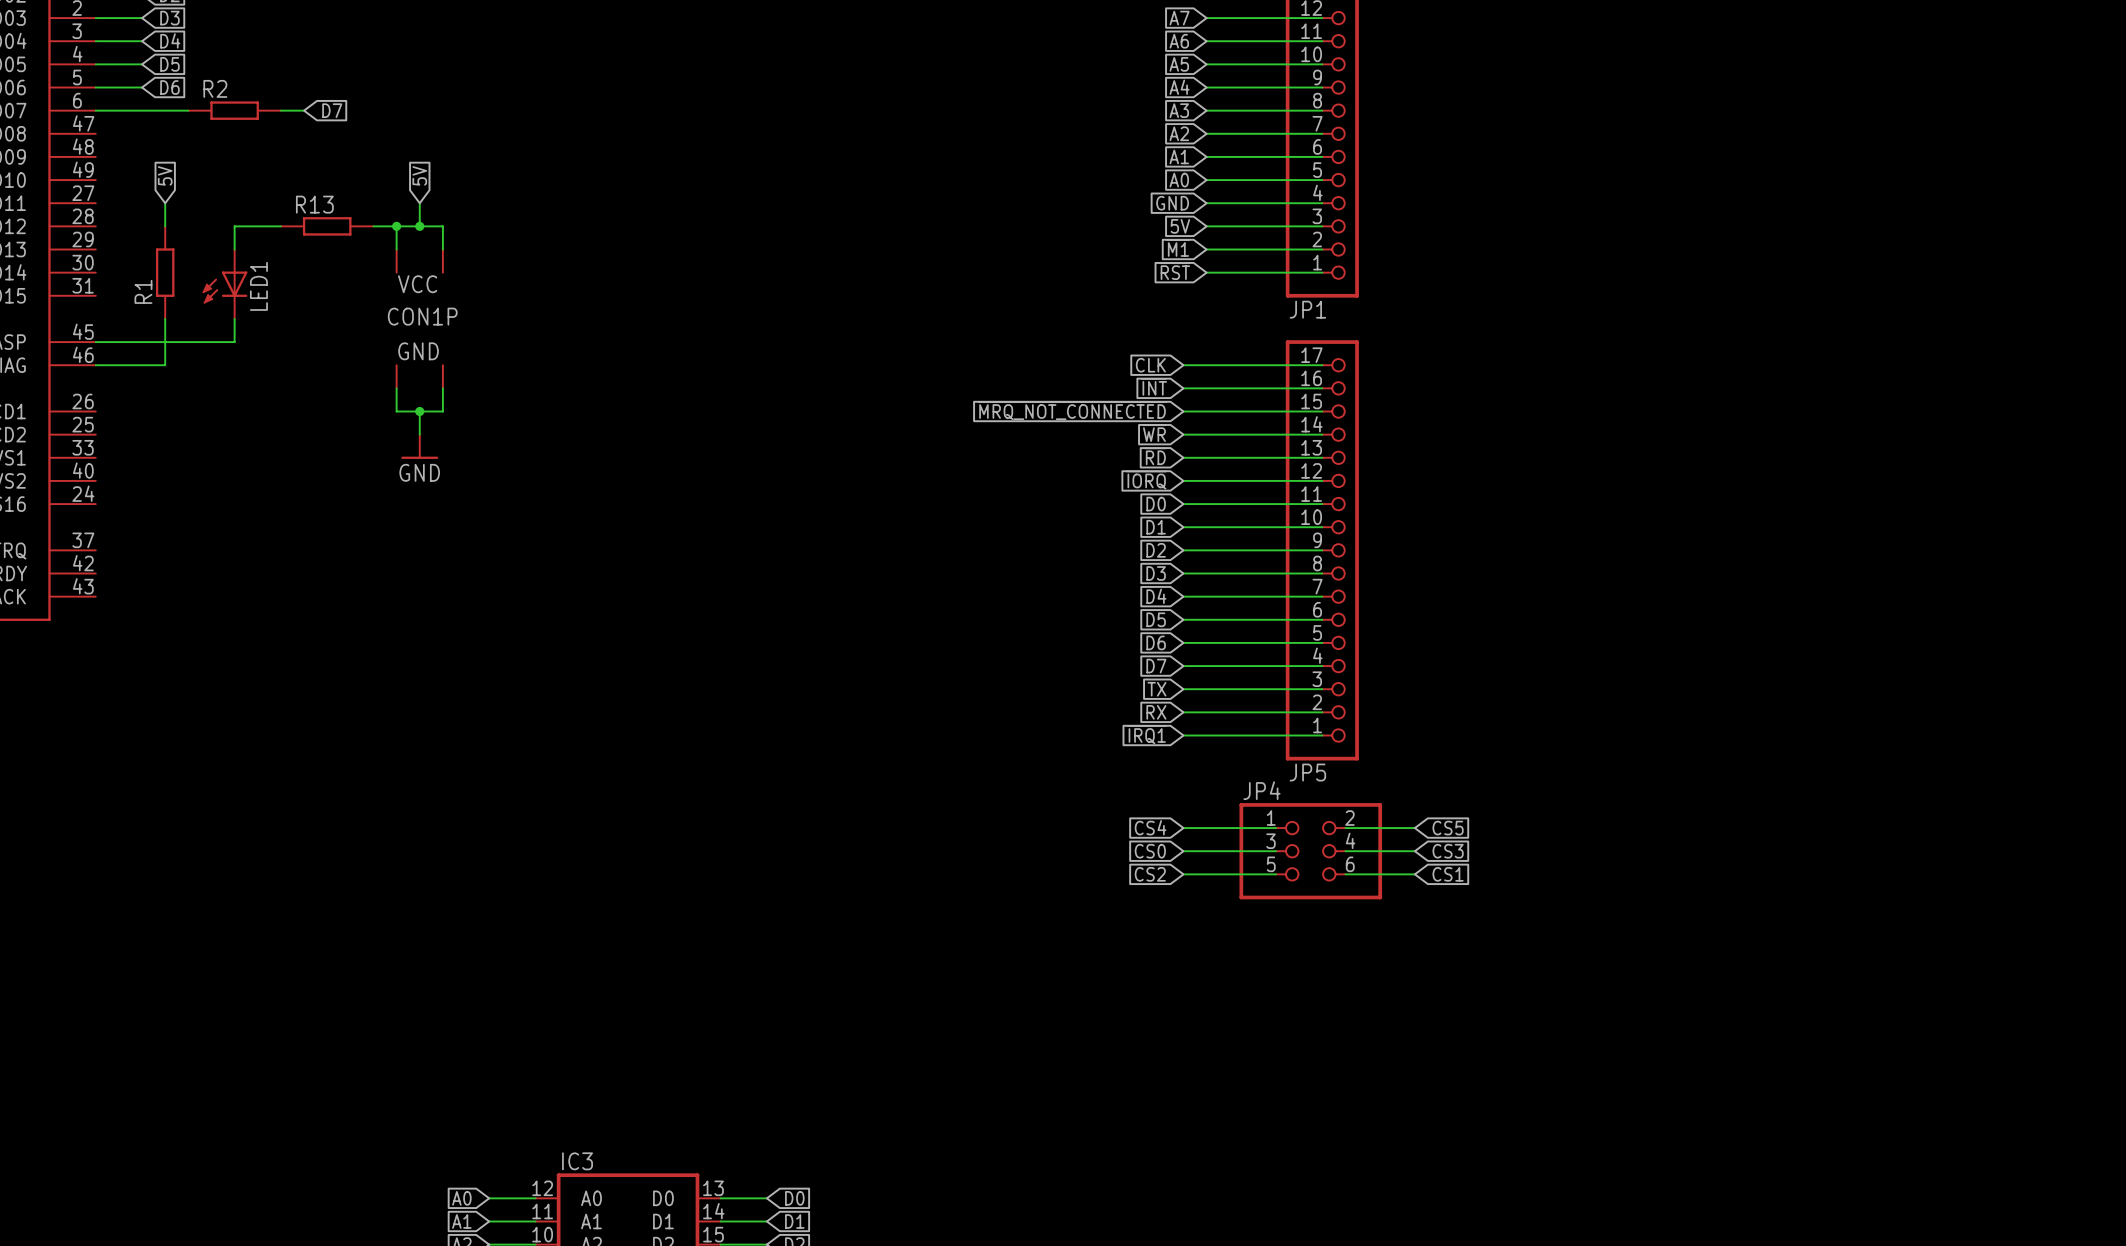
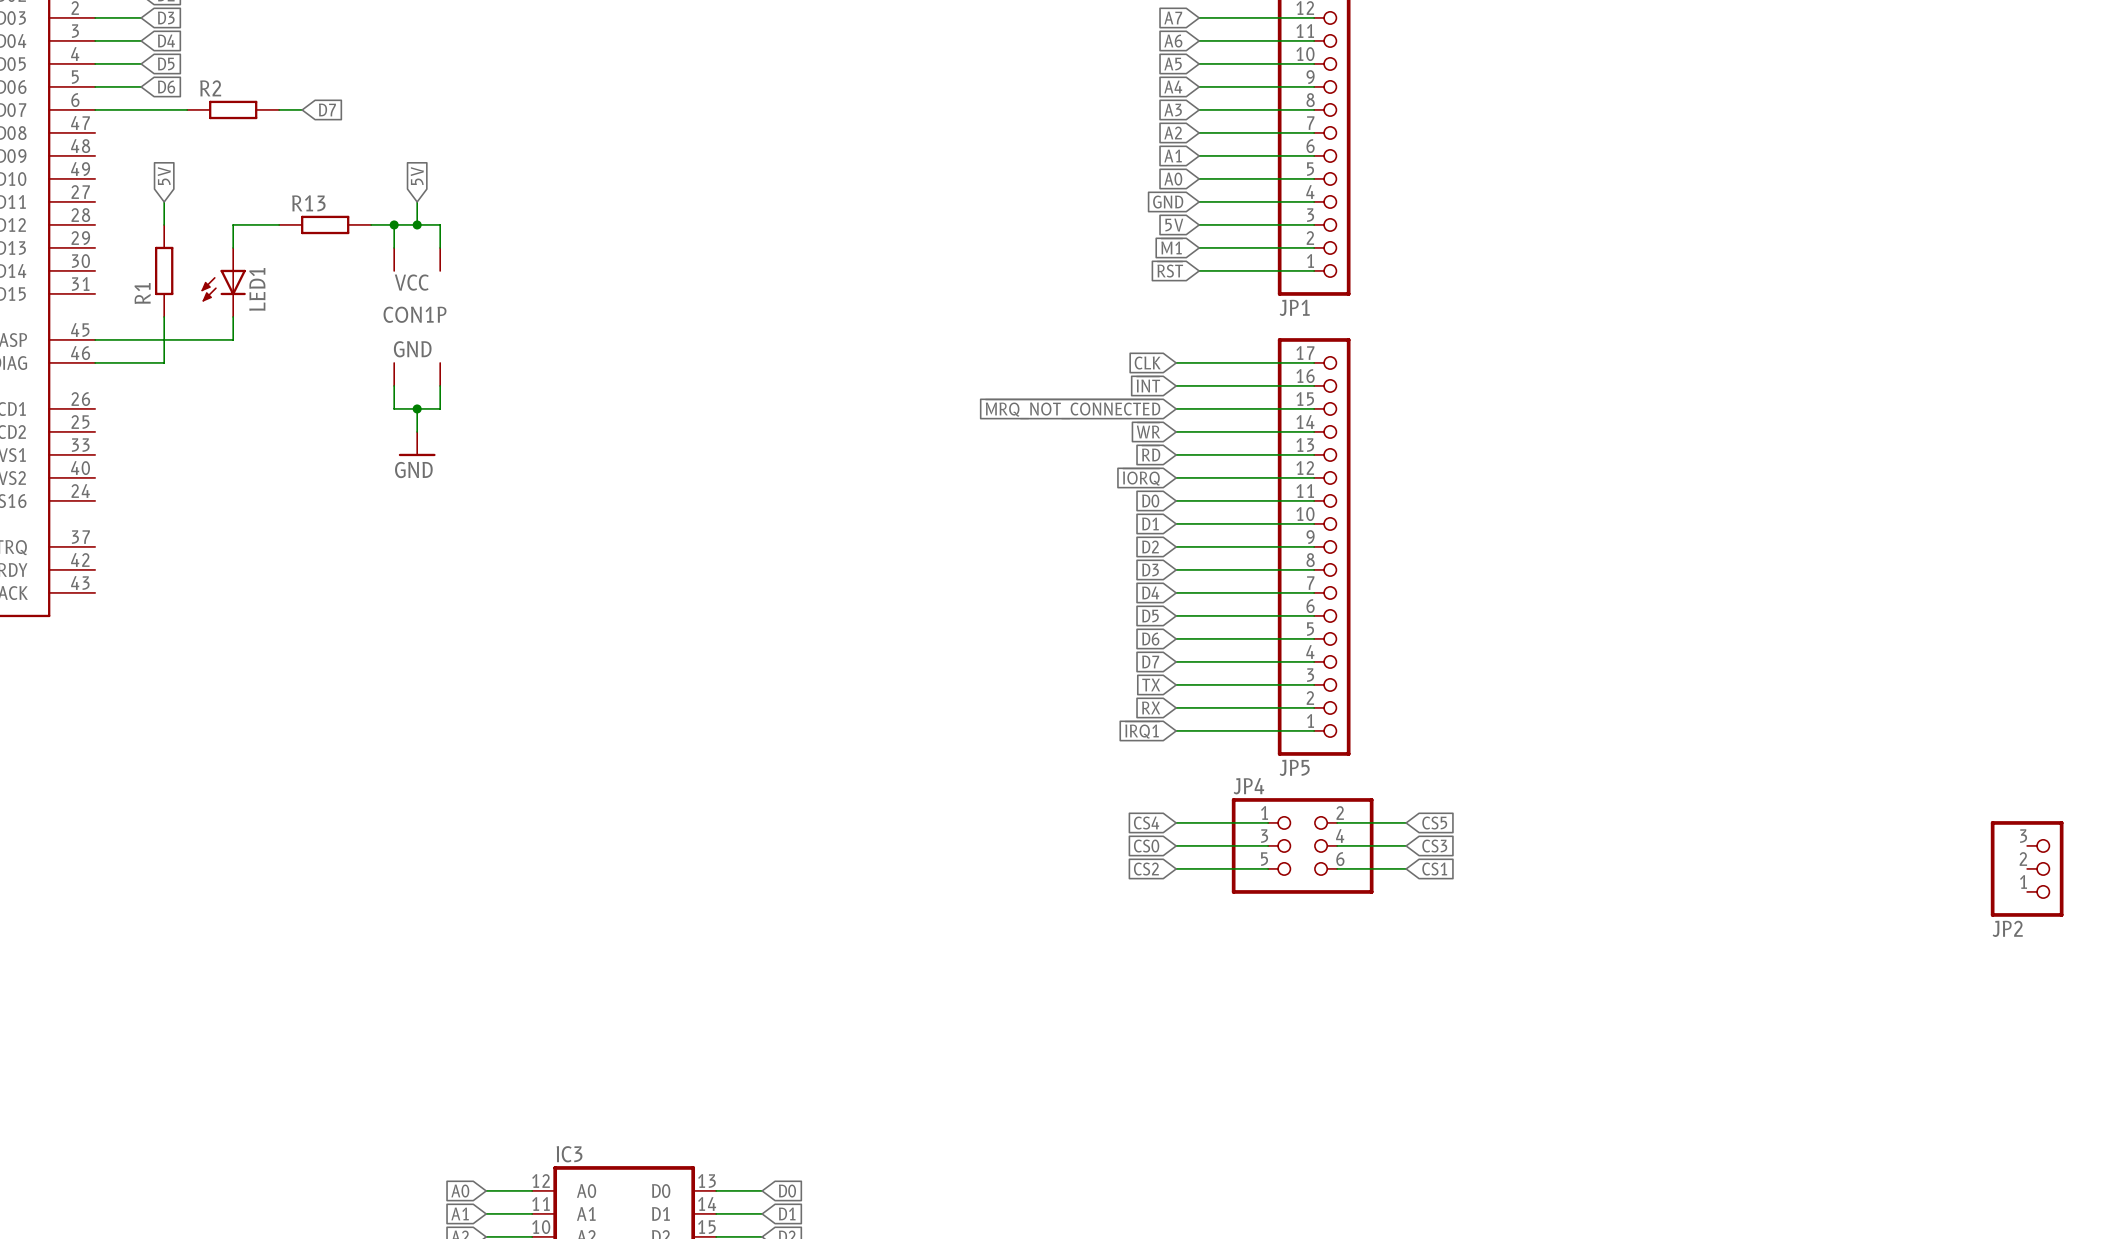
JP2: none -> (2027, 868)

